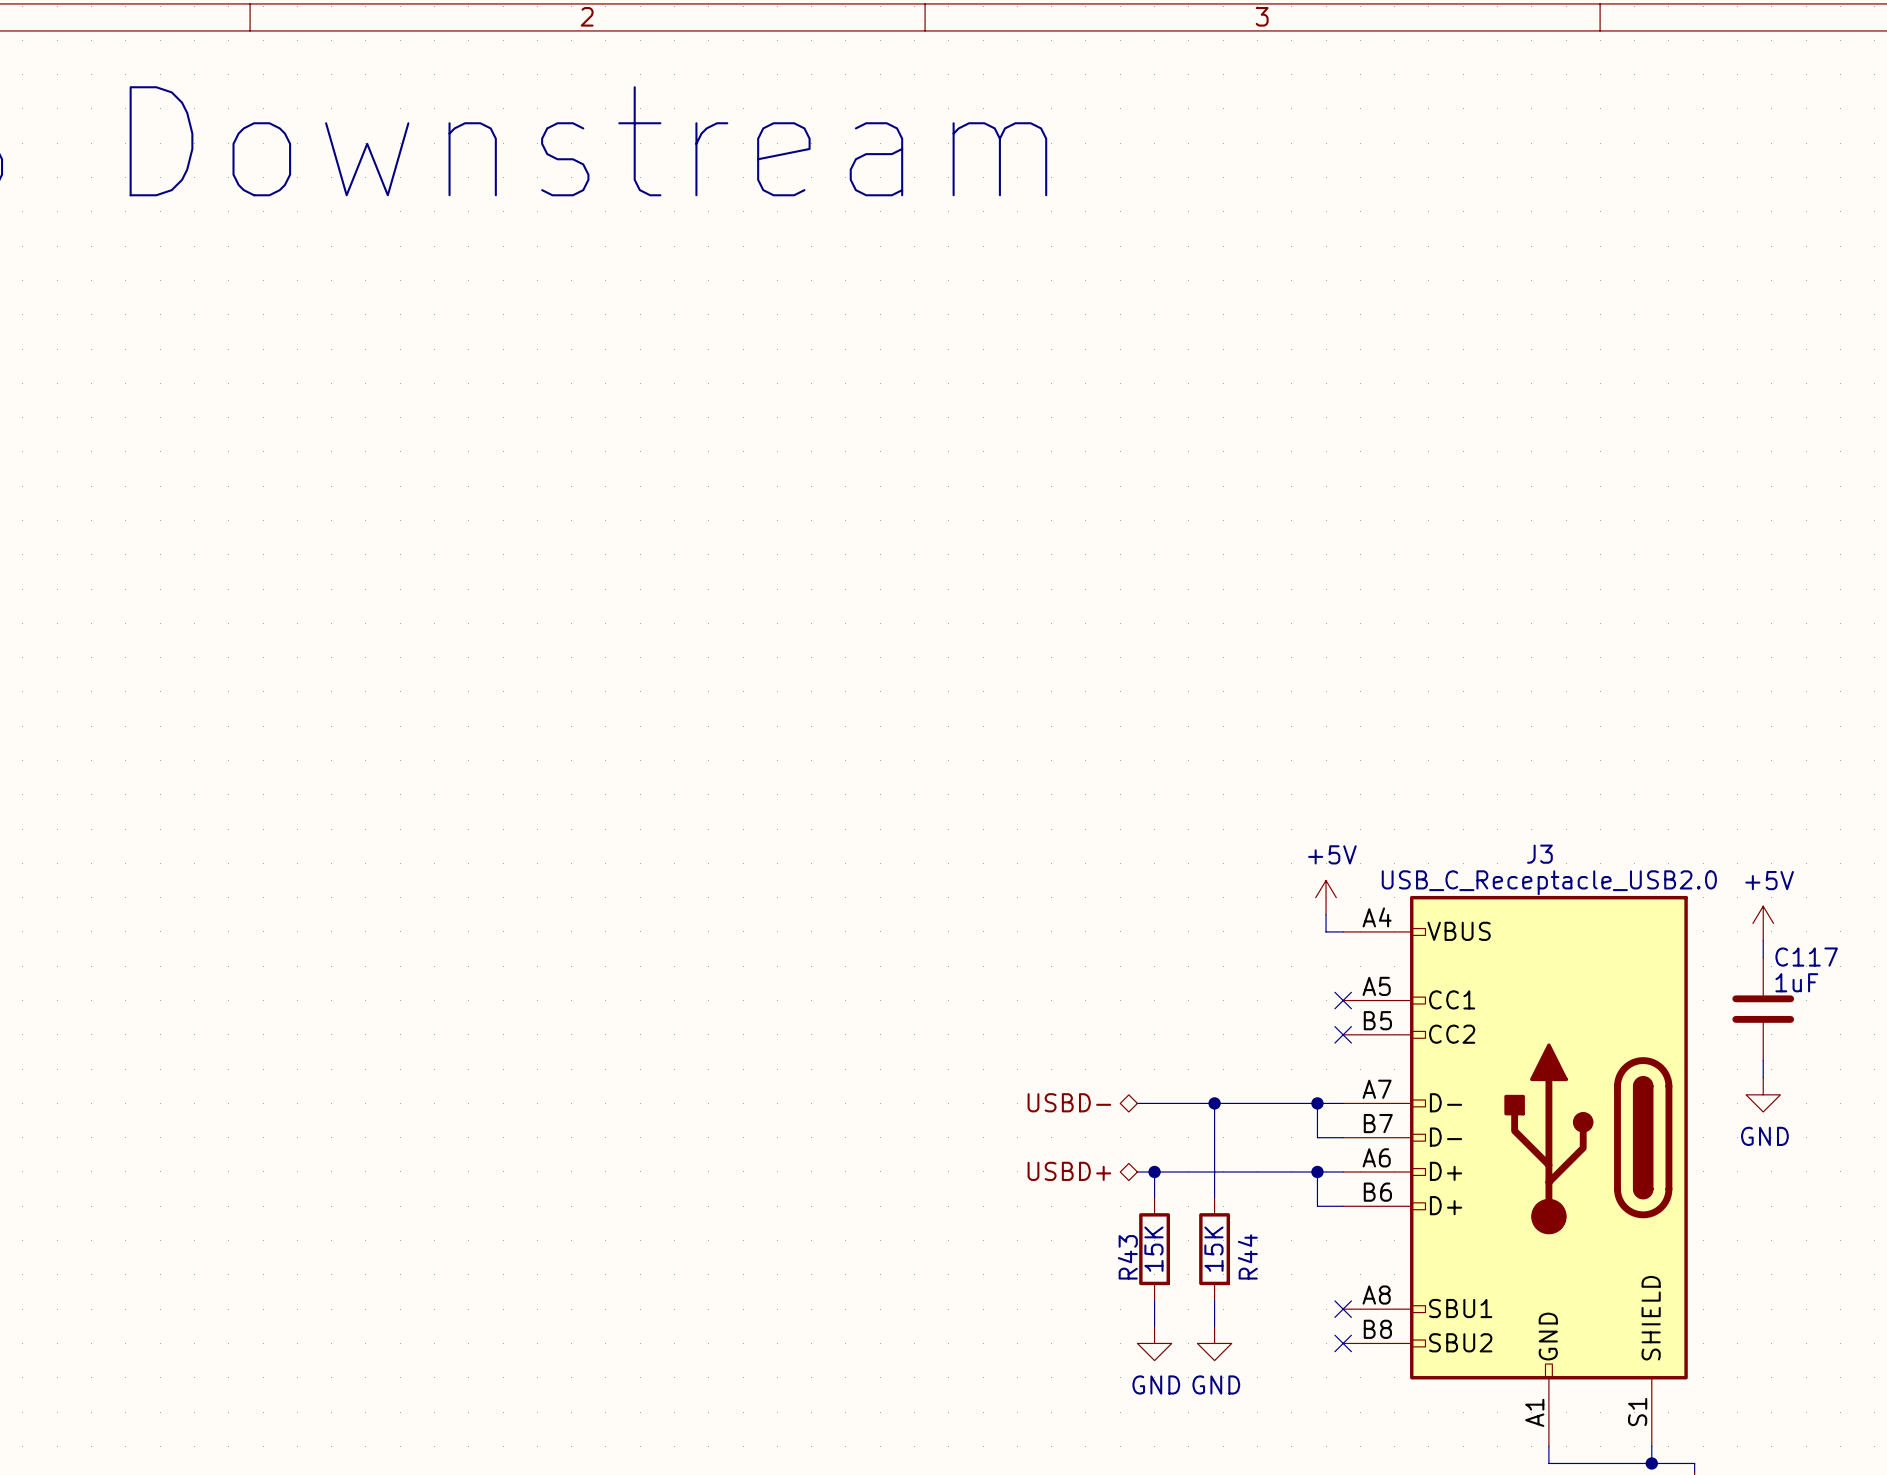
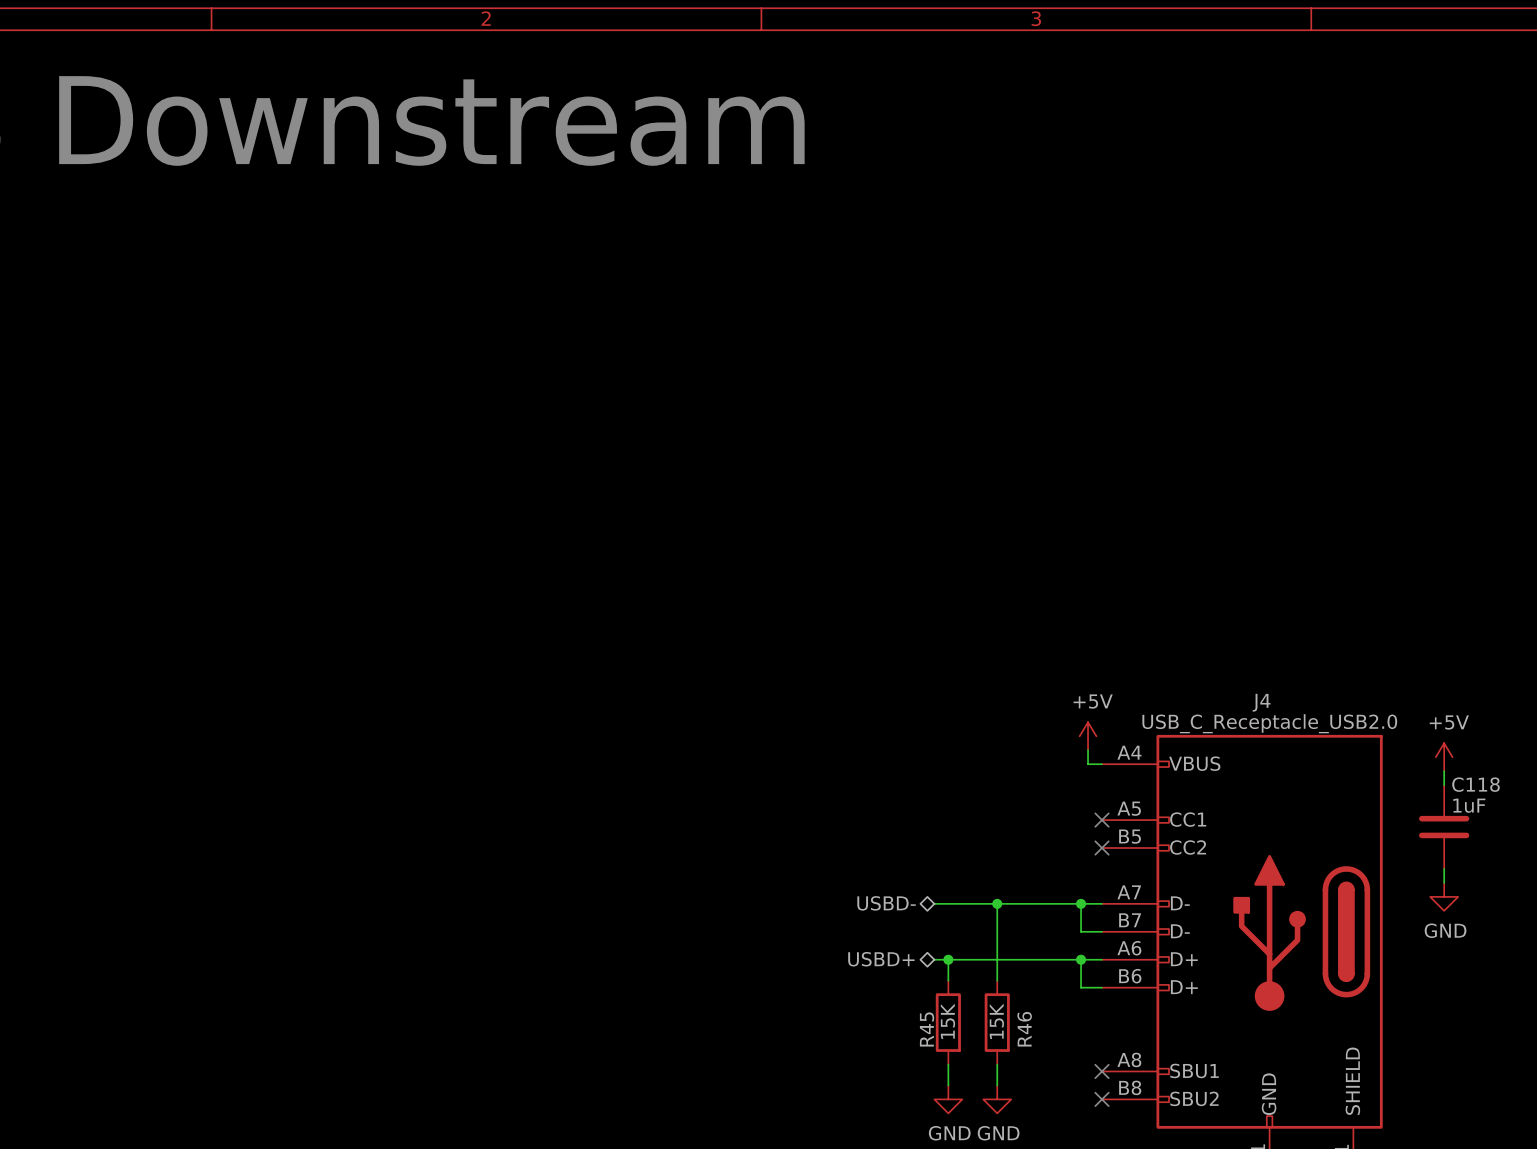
J3 name: J3 (1539, 854) -> J4 (1261, 702)
C117 name: C117 (1806, 957) -> C118 (1476, 784)
R44 name: R44 (1247, 1256) -> R46 (1024, 1029)
R43 name: R43 (1127, 1257) -> R45 (927, 1029)

